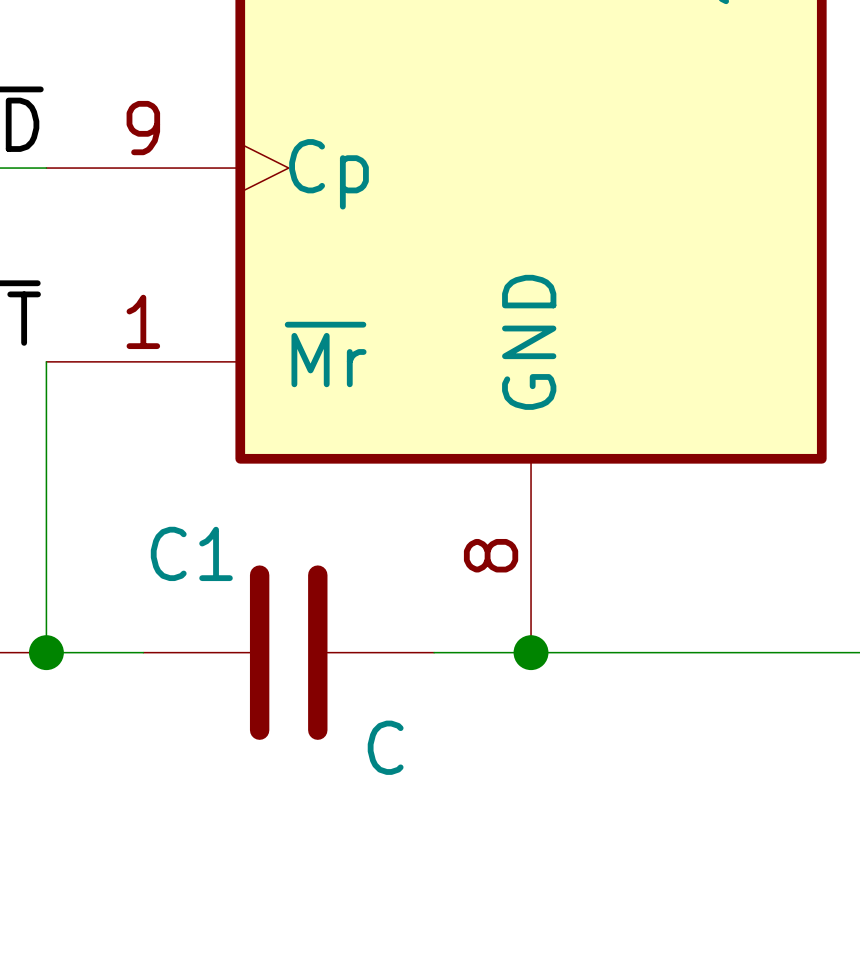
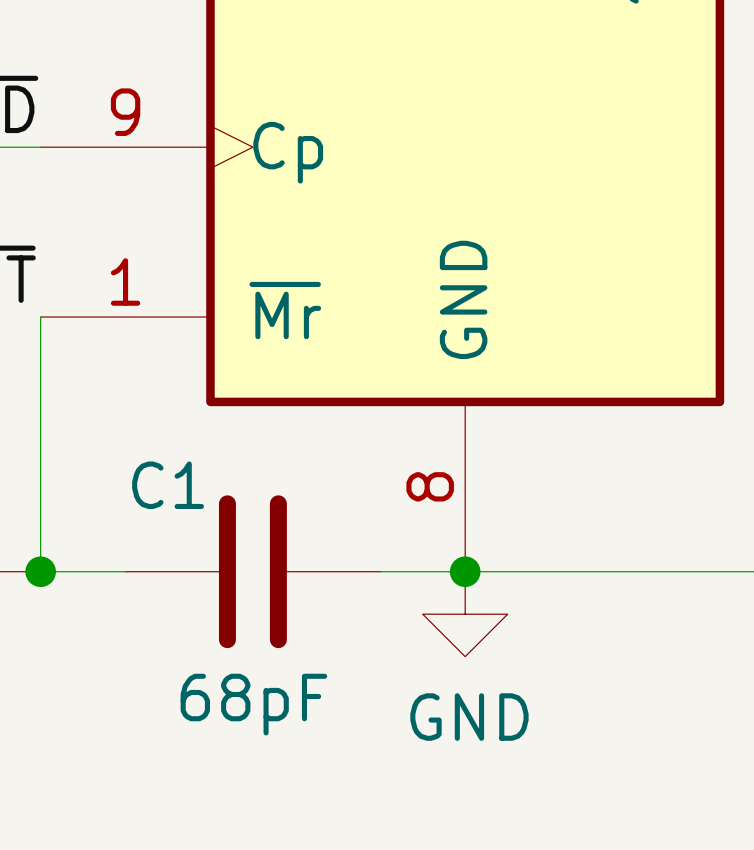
power symbol: none -> GND (465, 614)
C1 value: C (385, 747) -> 68pF (253, 704)

